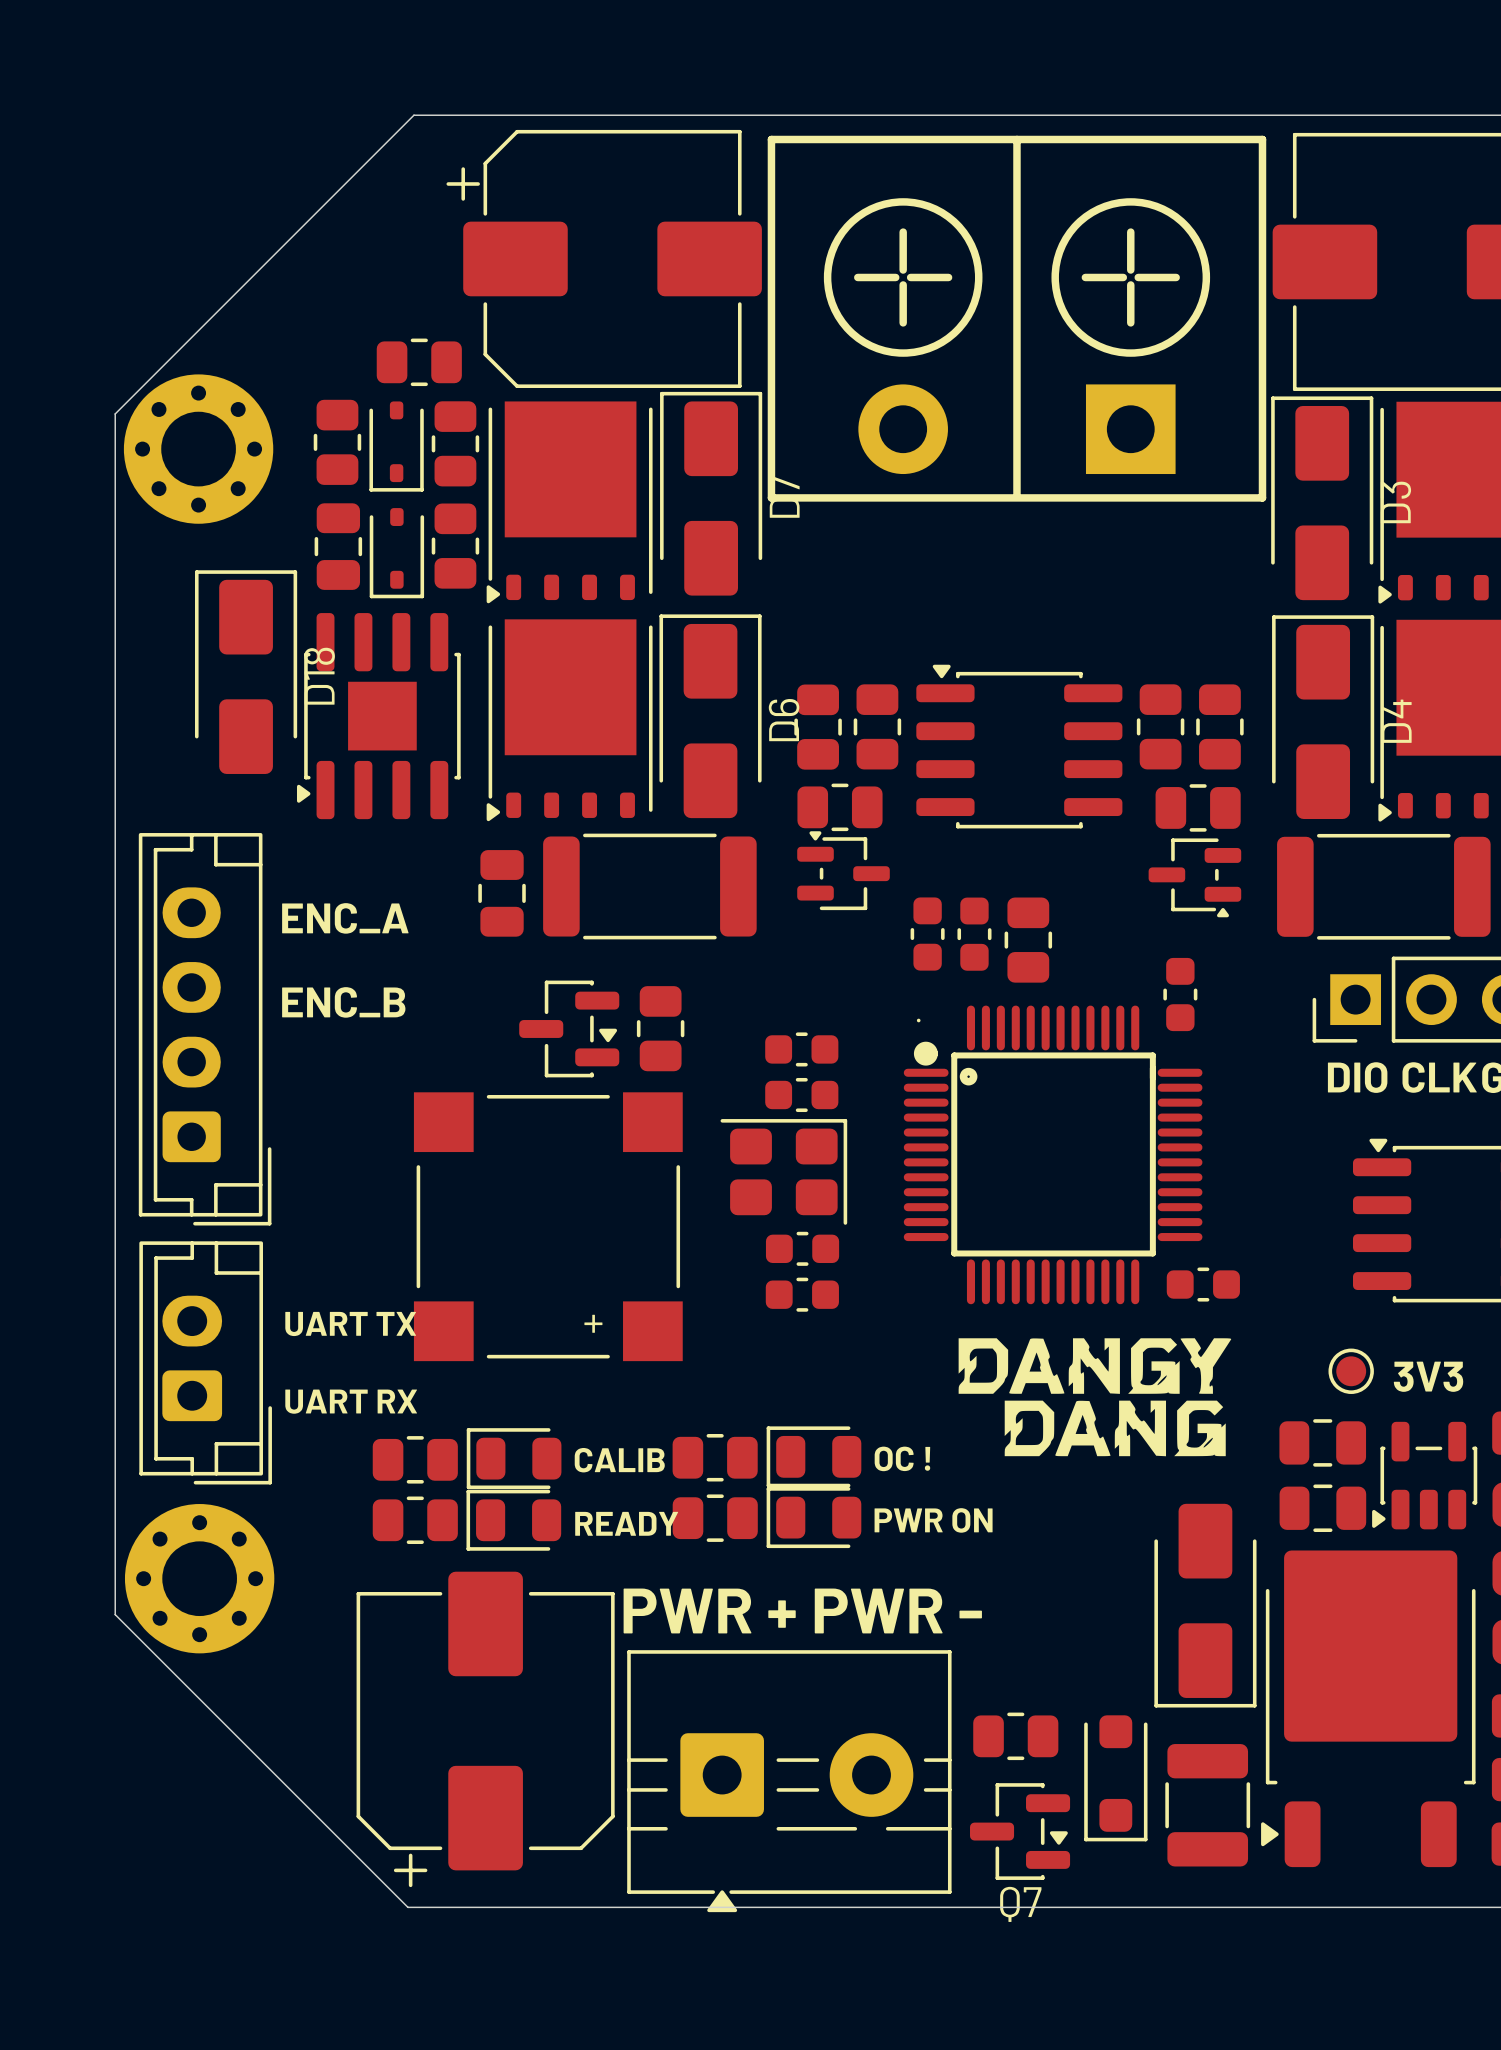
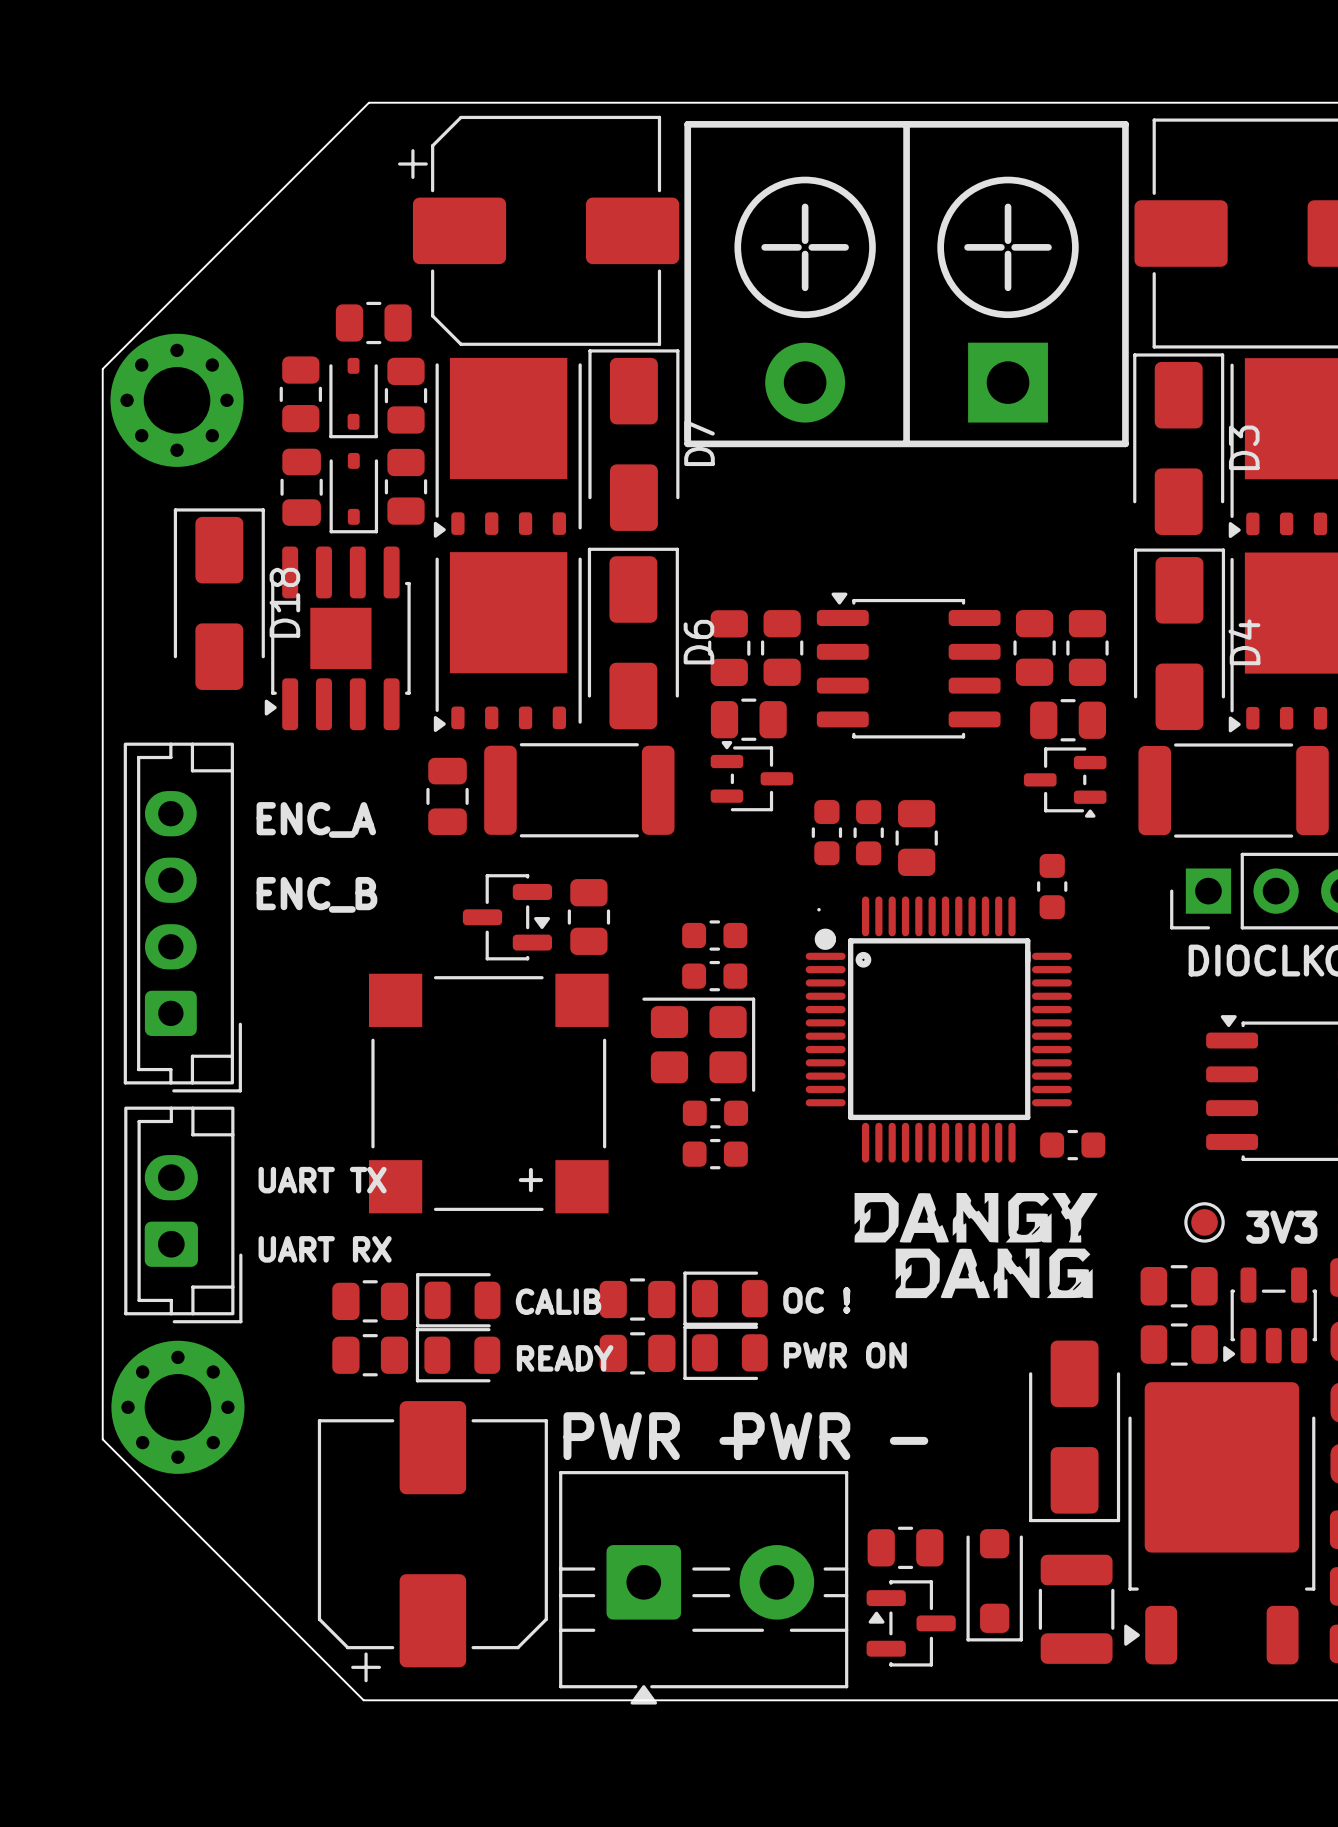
part: none -> (911, 1623)
Q7: (1020, 1831) -> none

